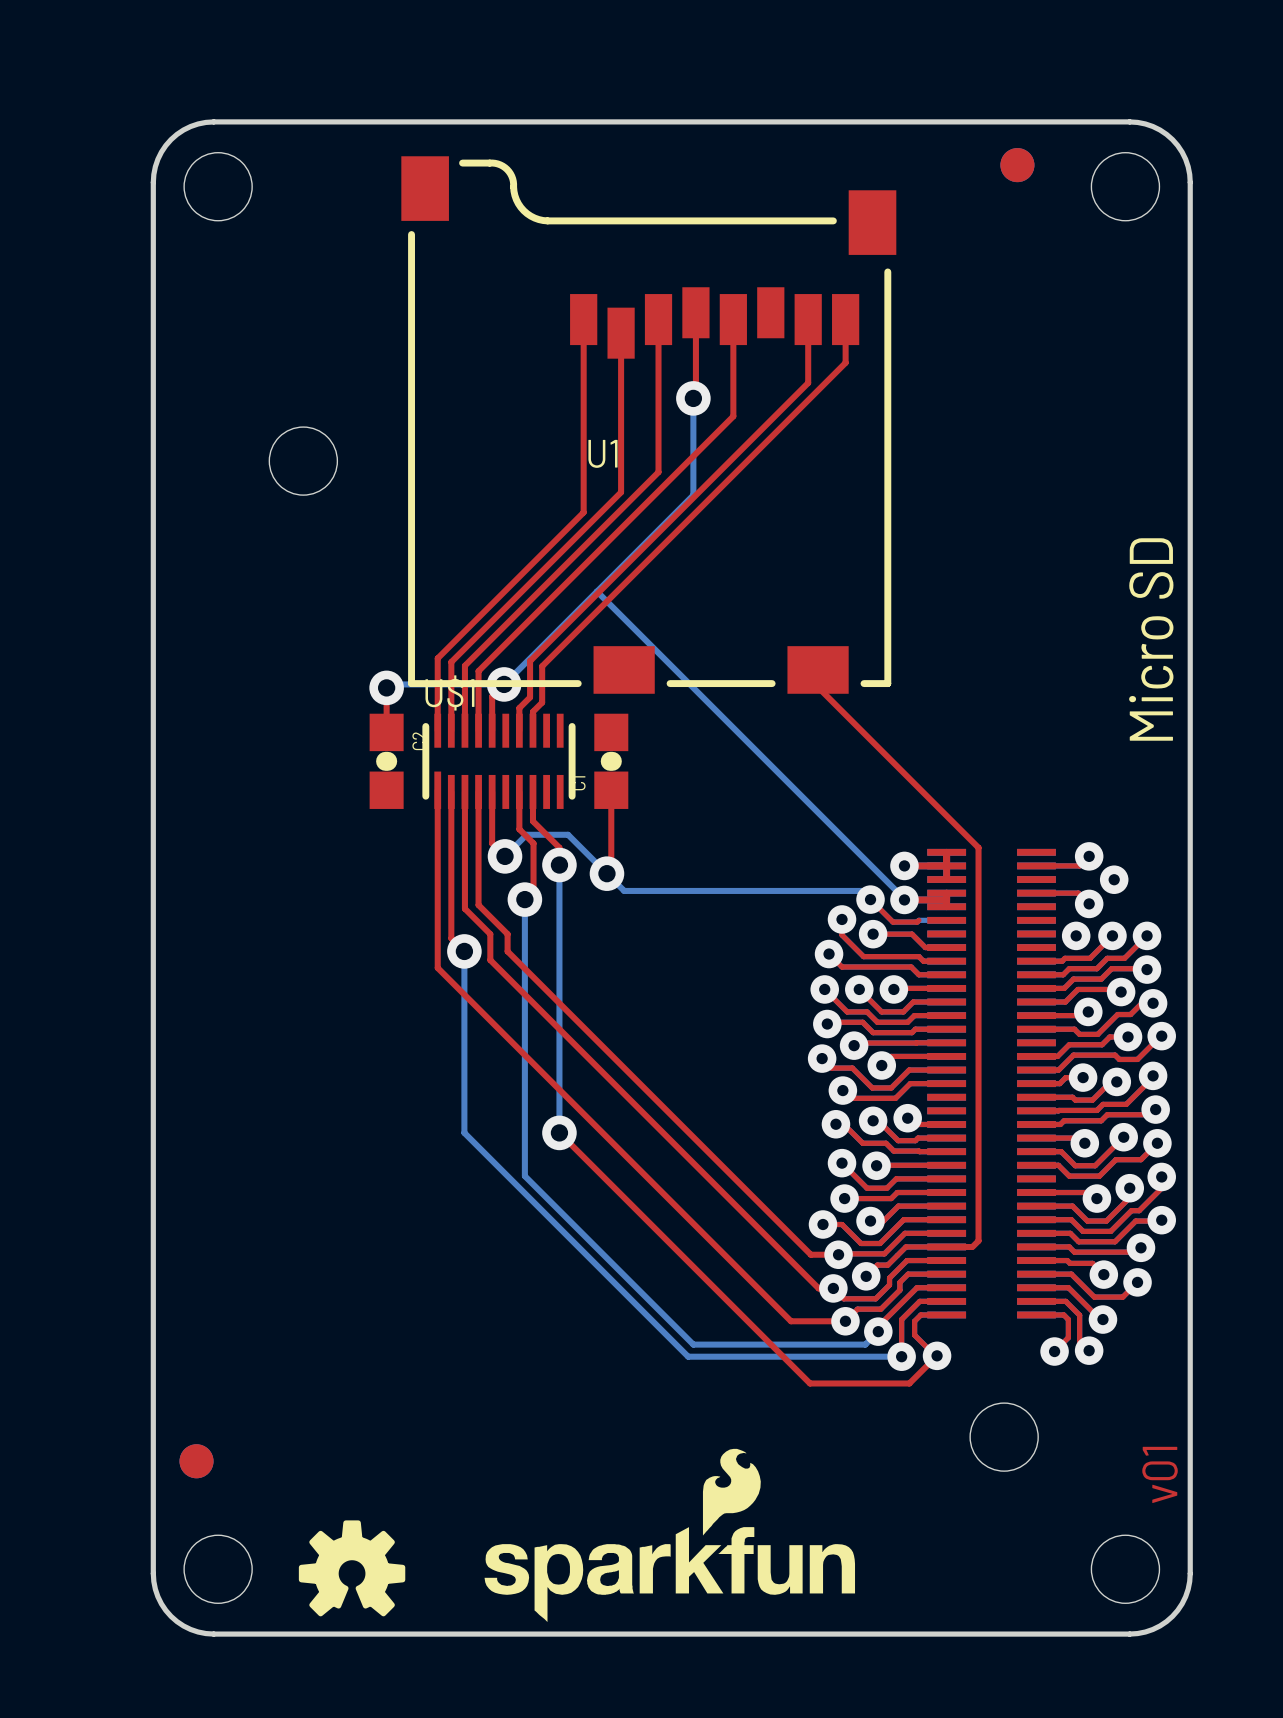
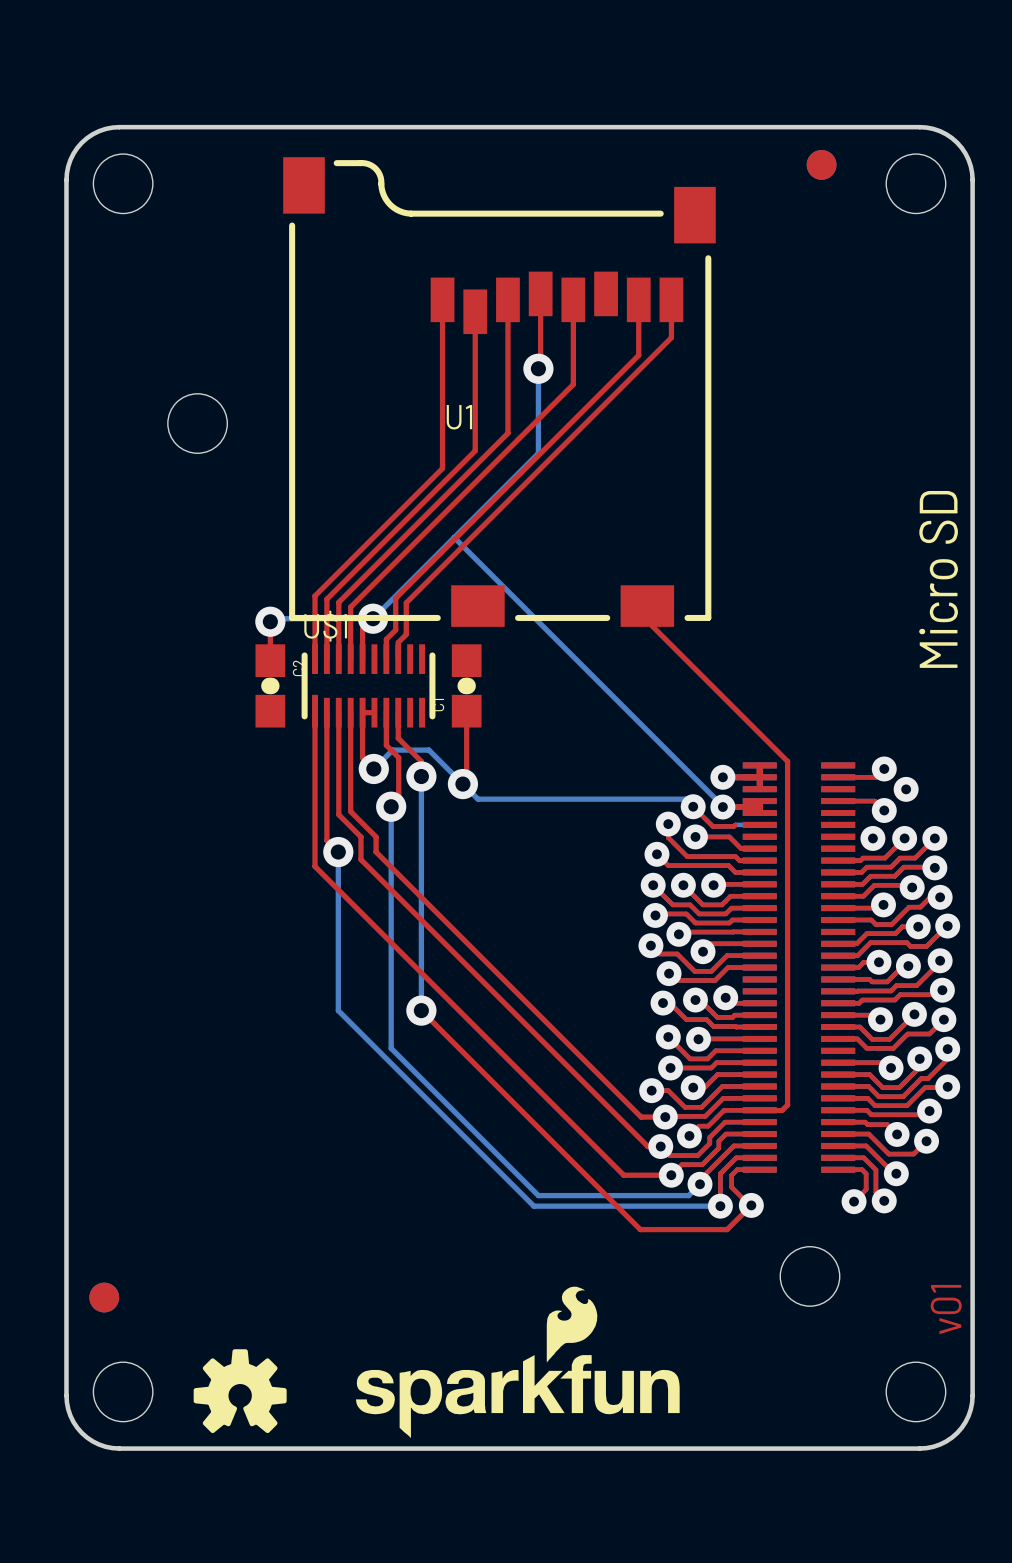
top track: none -> (362, 712) (374, 712)

